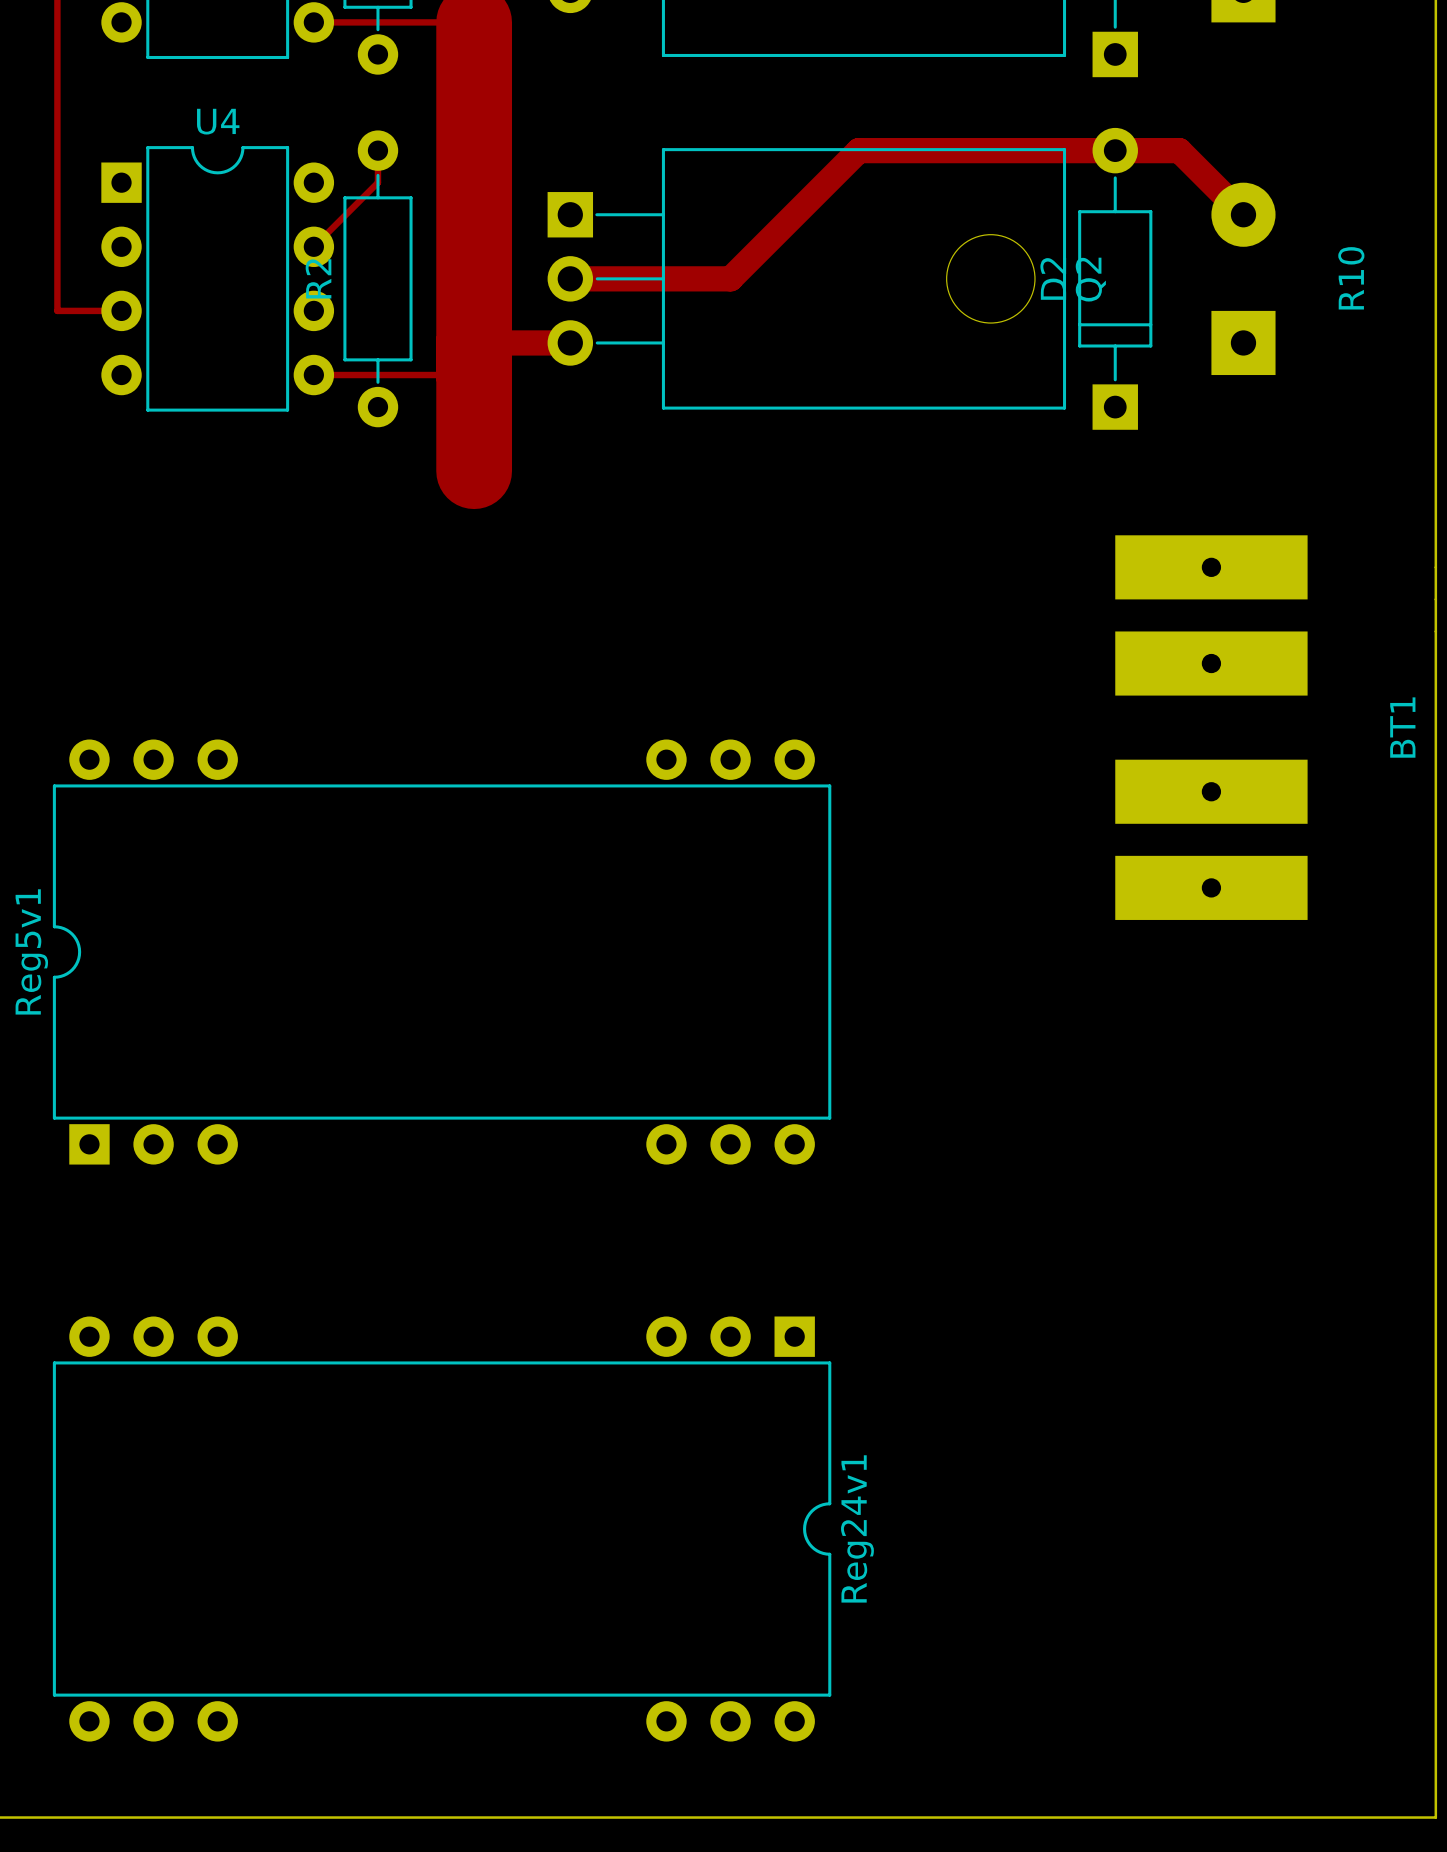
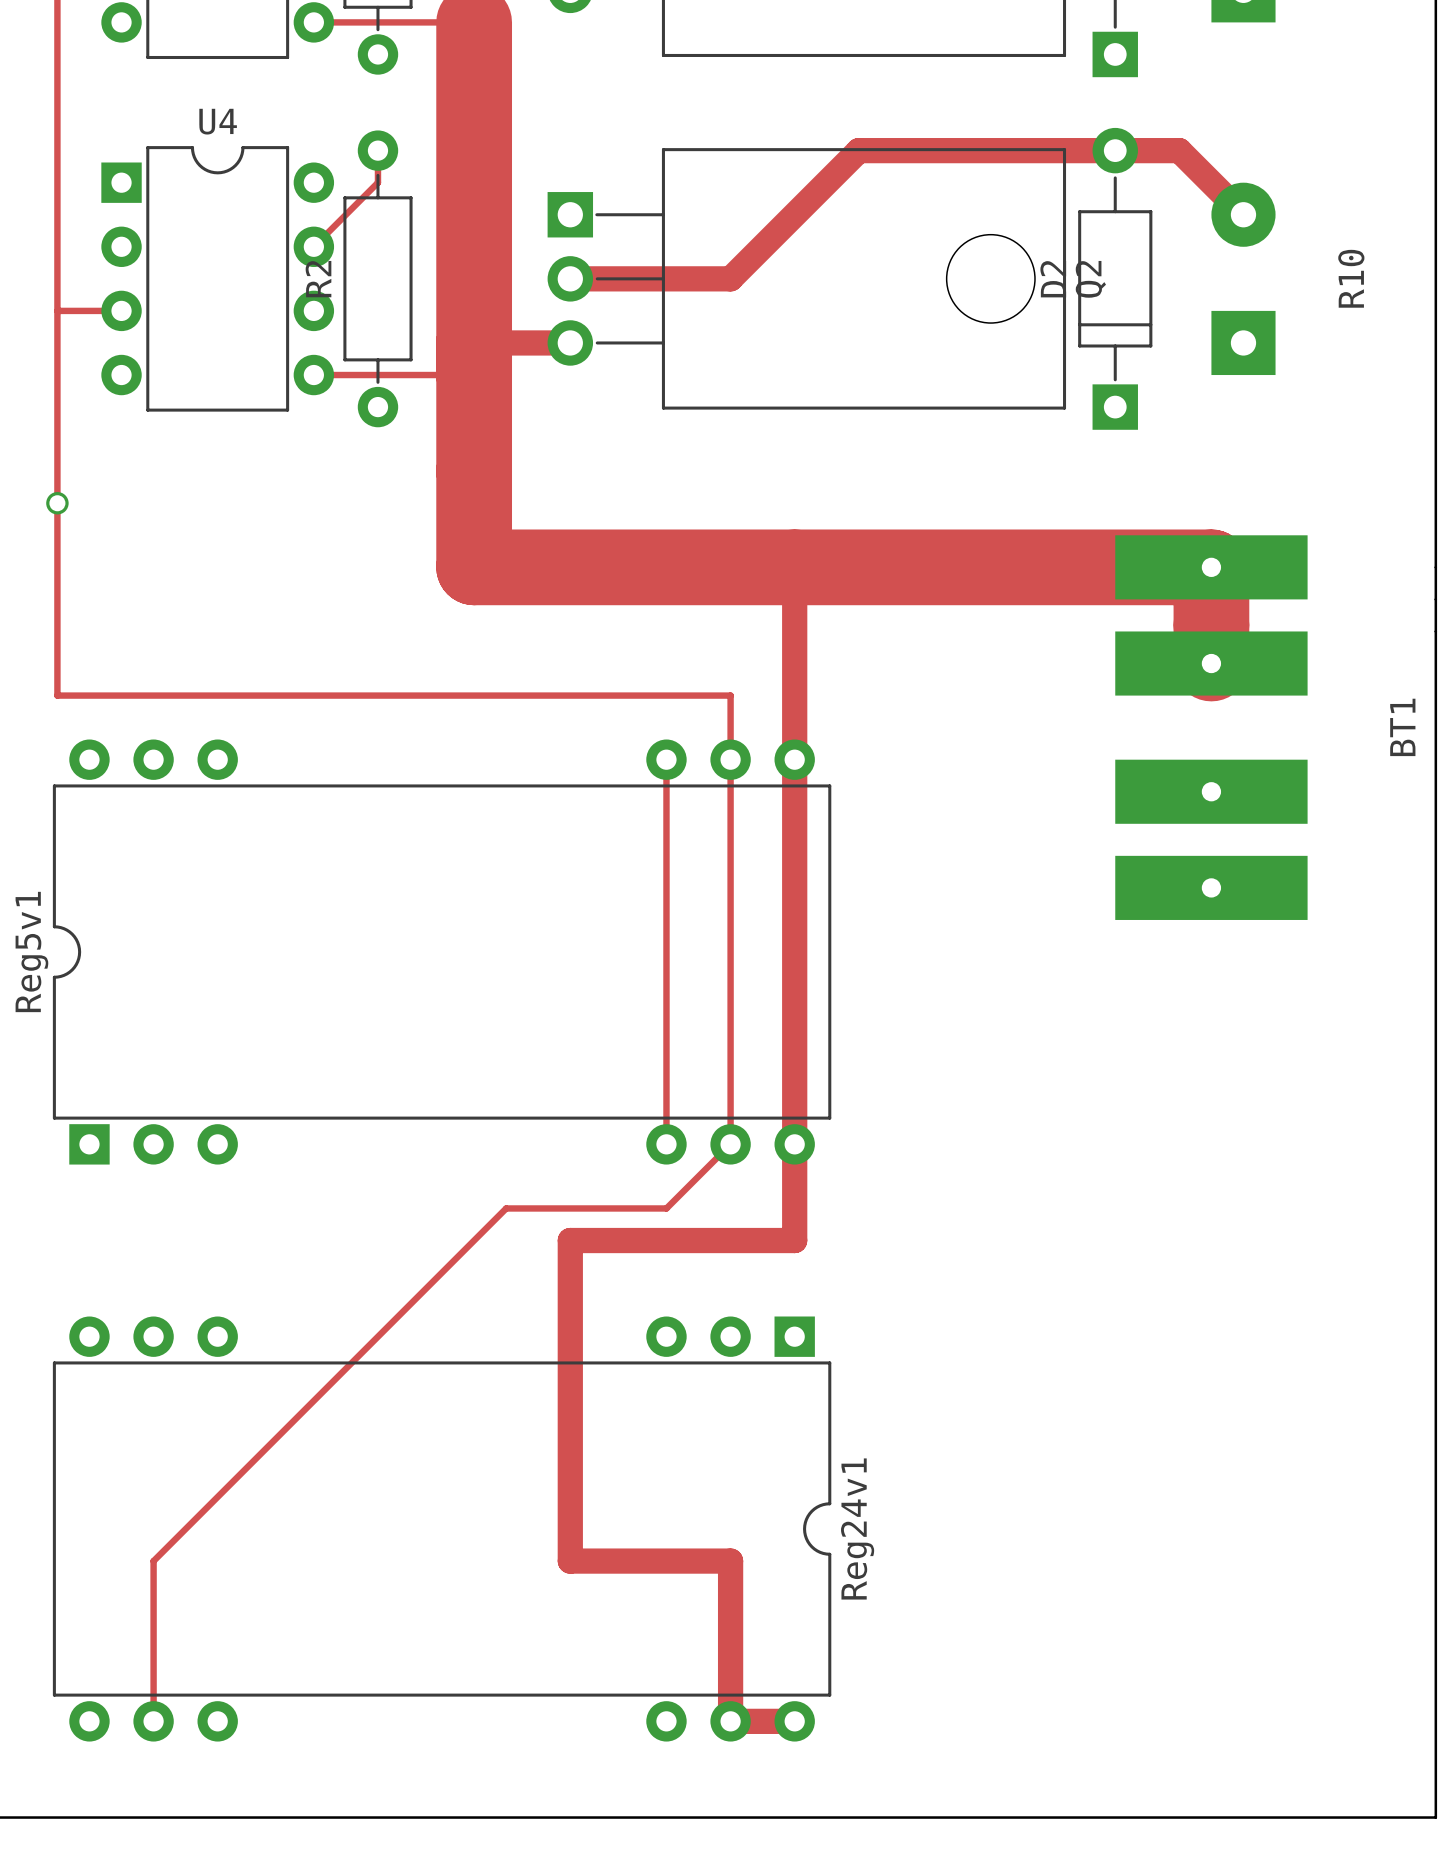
track: none -> (57, 310) (57, 695) (730, 695) (730, 1144) (666, 1208) (506, 1208) (153, 1561) (153, 1721)
track: none -> (474, 471) (474, 567) (1211, 567) (1211, 663)
via: none -> (57, 503)
track: none -> (794, 567) (794, 1240) (570, 1240) (570, 1561) (730, 1561) (730, 1721) (794, 1721)
track: none -> (666, 759) (666, 1144)

